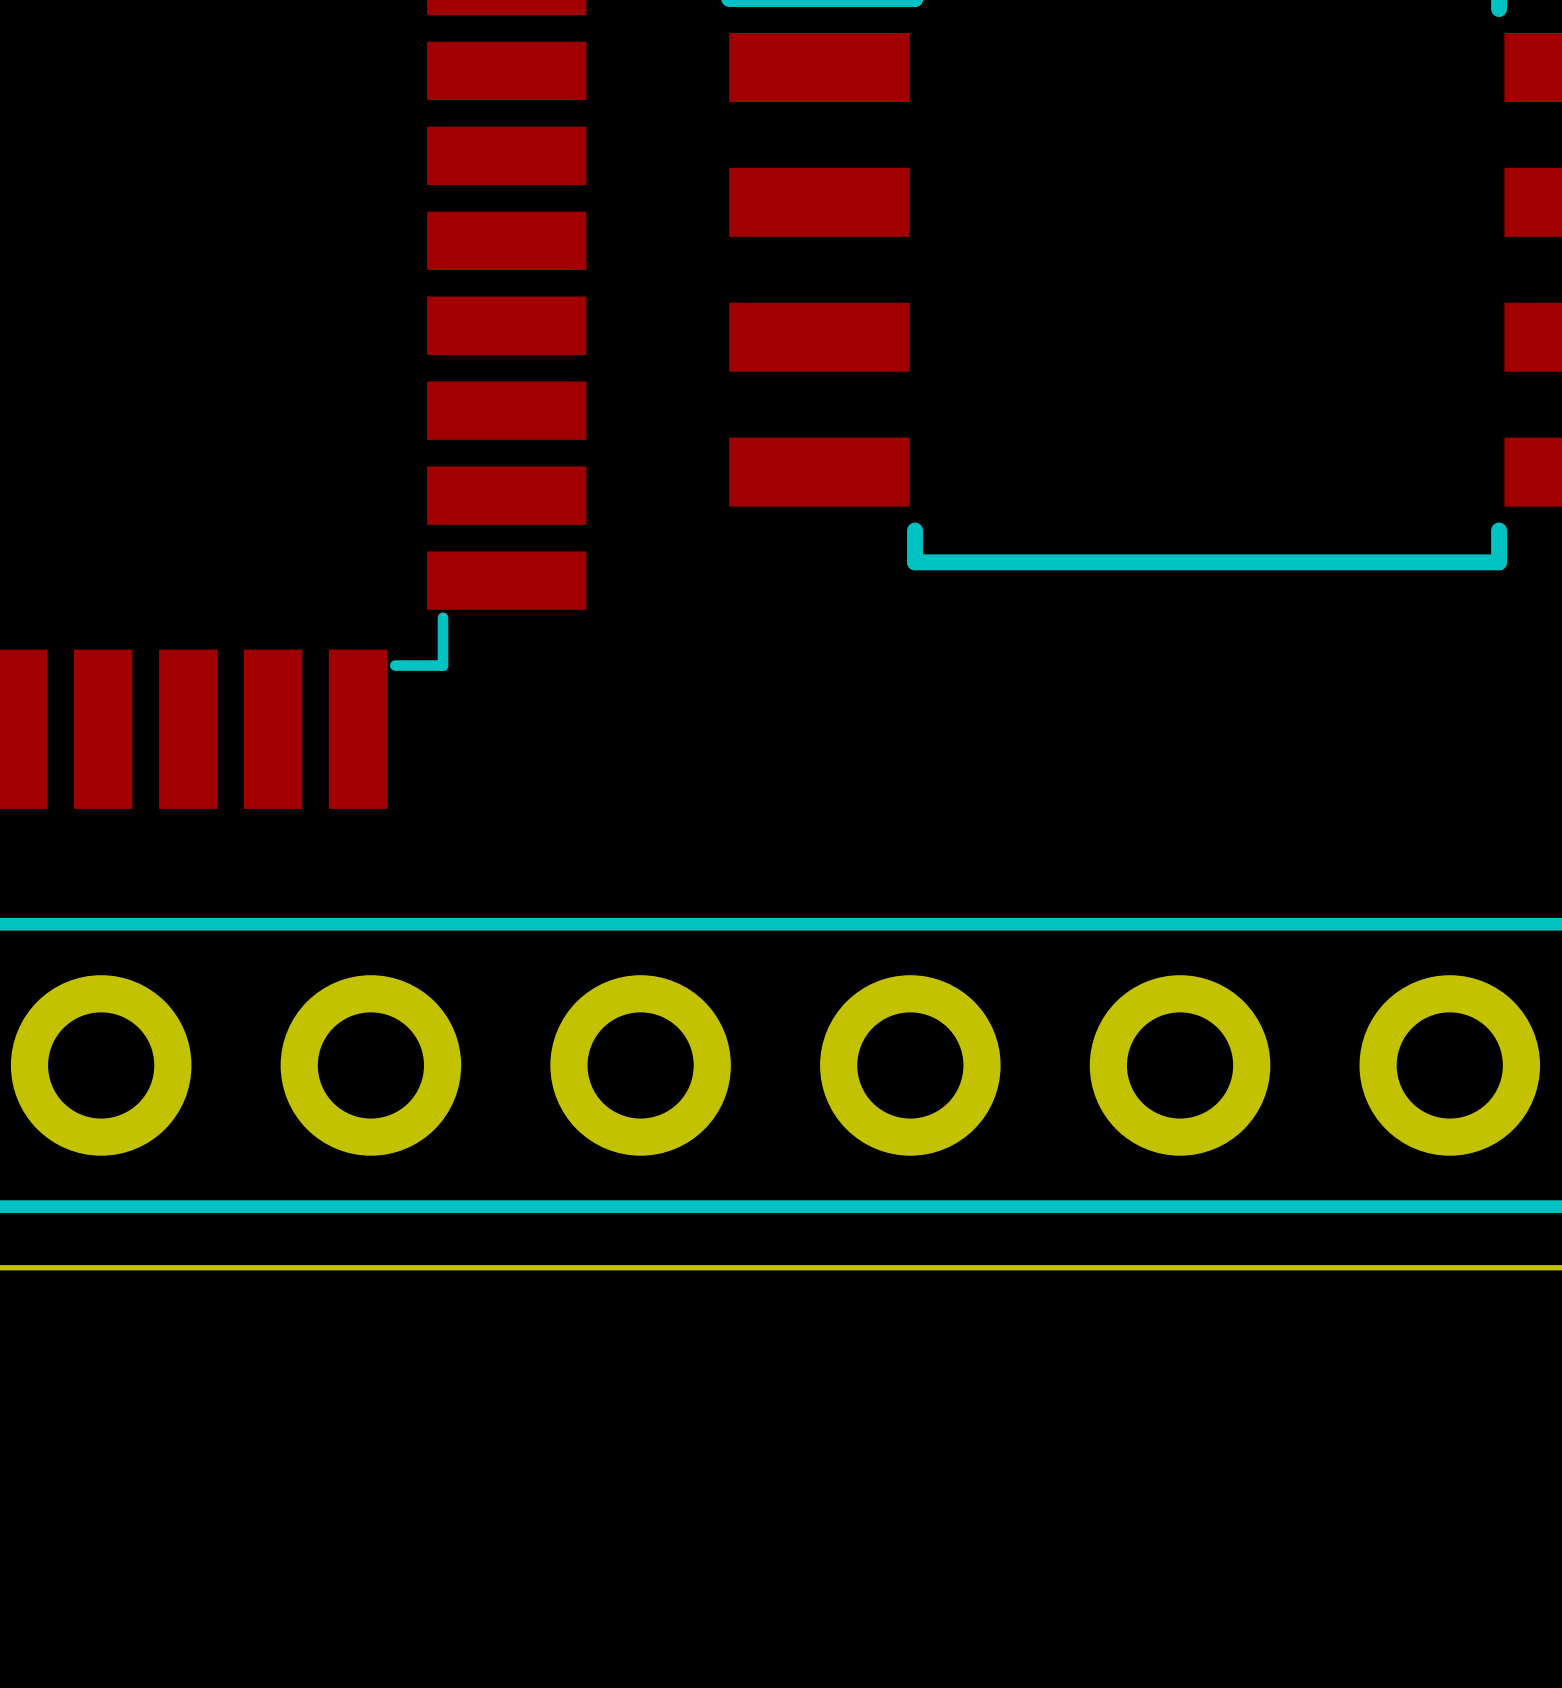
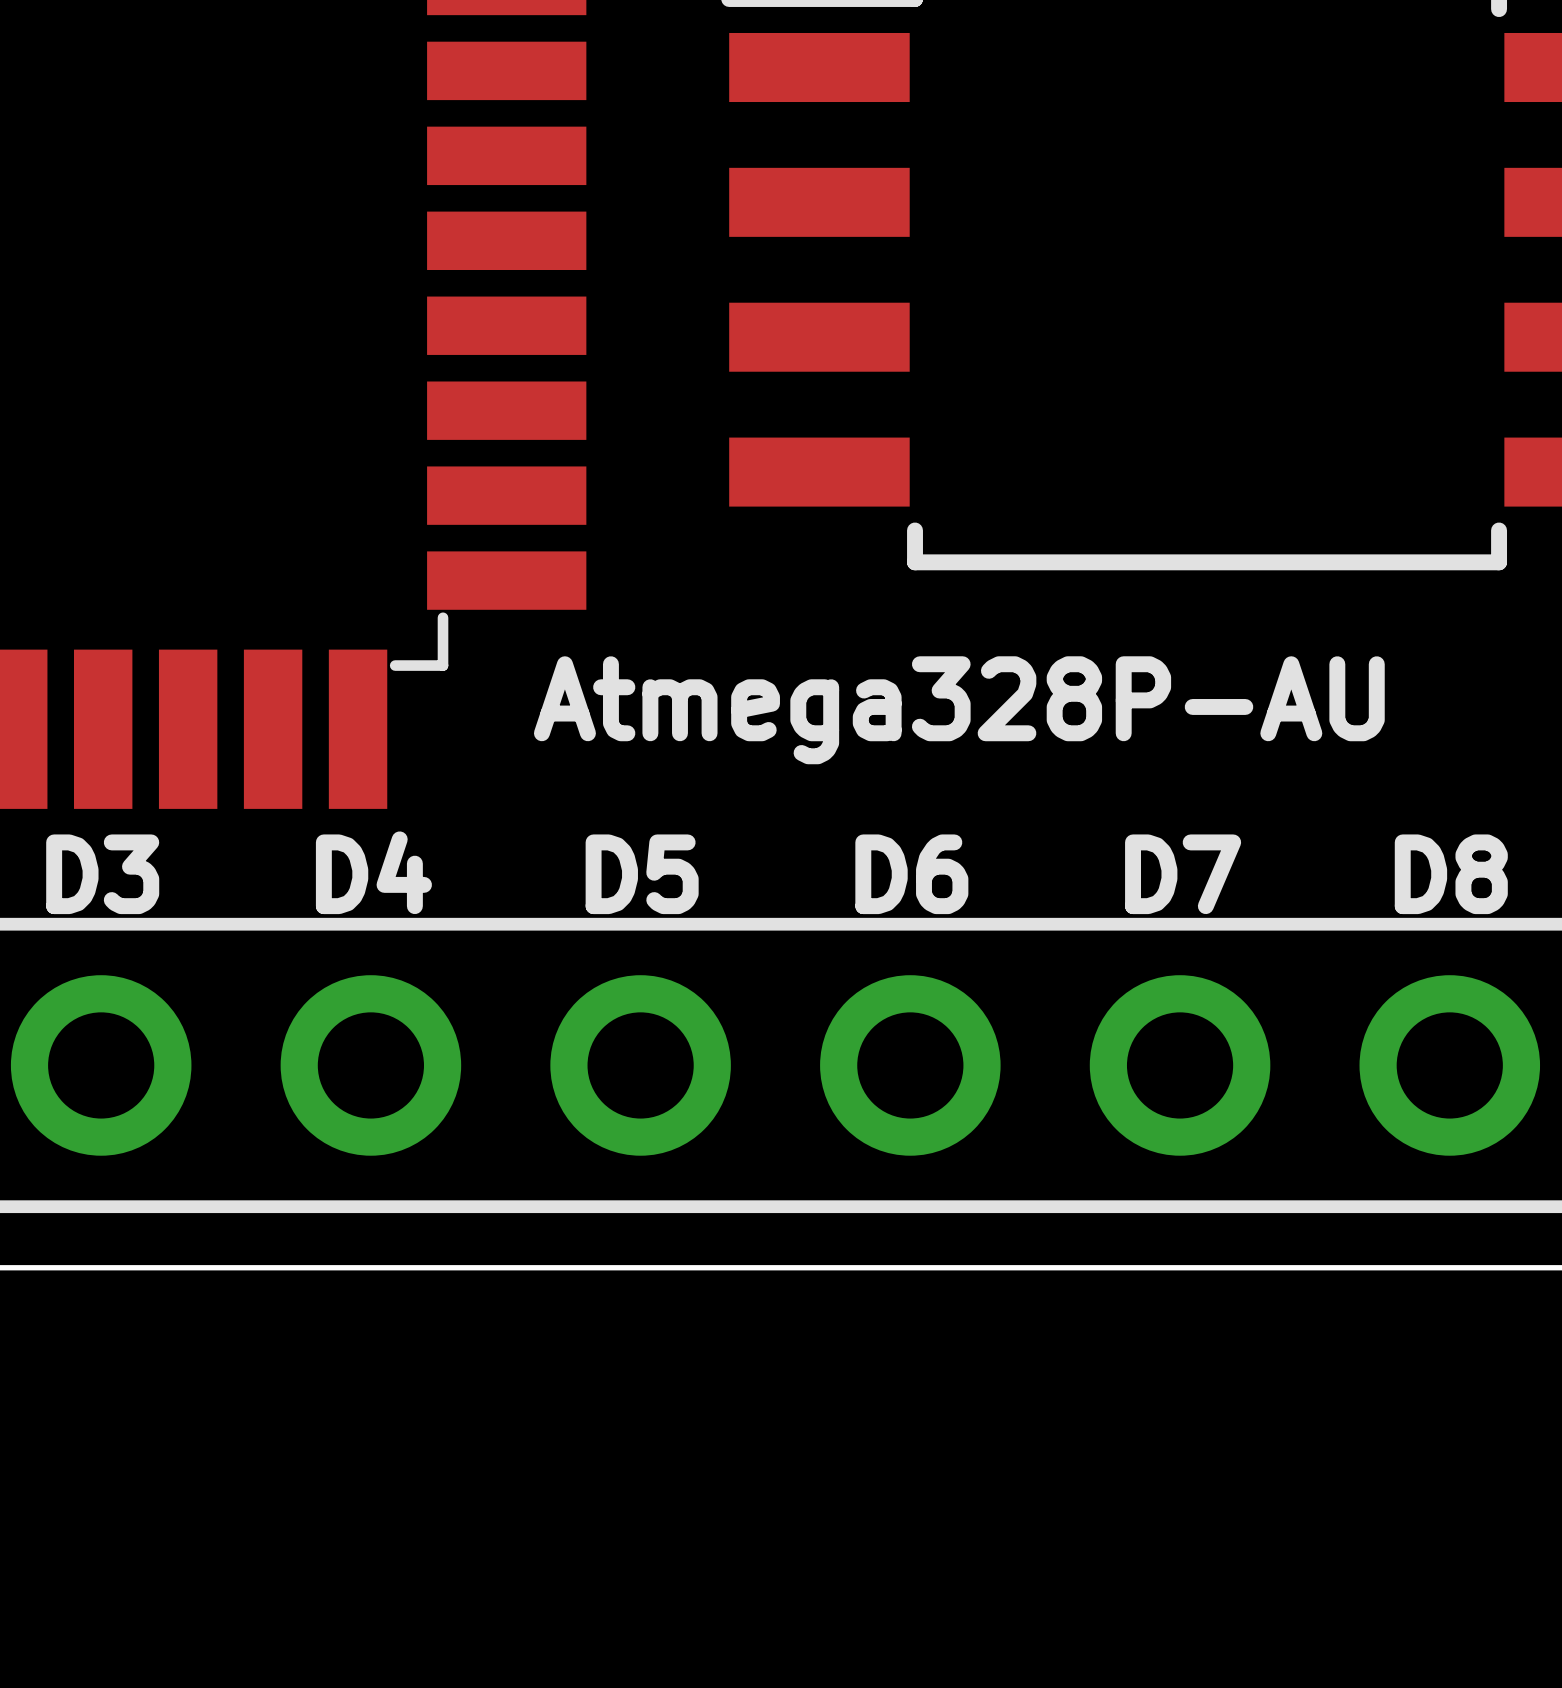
text: none -> Atmega328P-AU (959, 710)
text: none -> D4 (373, 872)
text: none -> D3 (102, 874)
text: none -> D5 (642, 874)
text: none -> D6 (911, 874)
text: none -> D7 (1183, 874)
text: none -> D8 (1451, 874)

